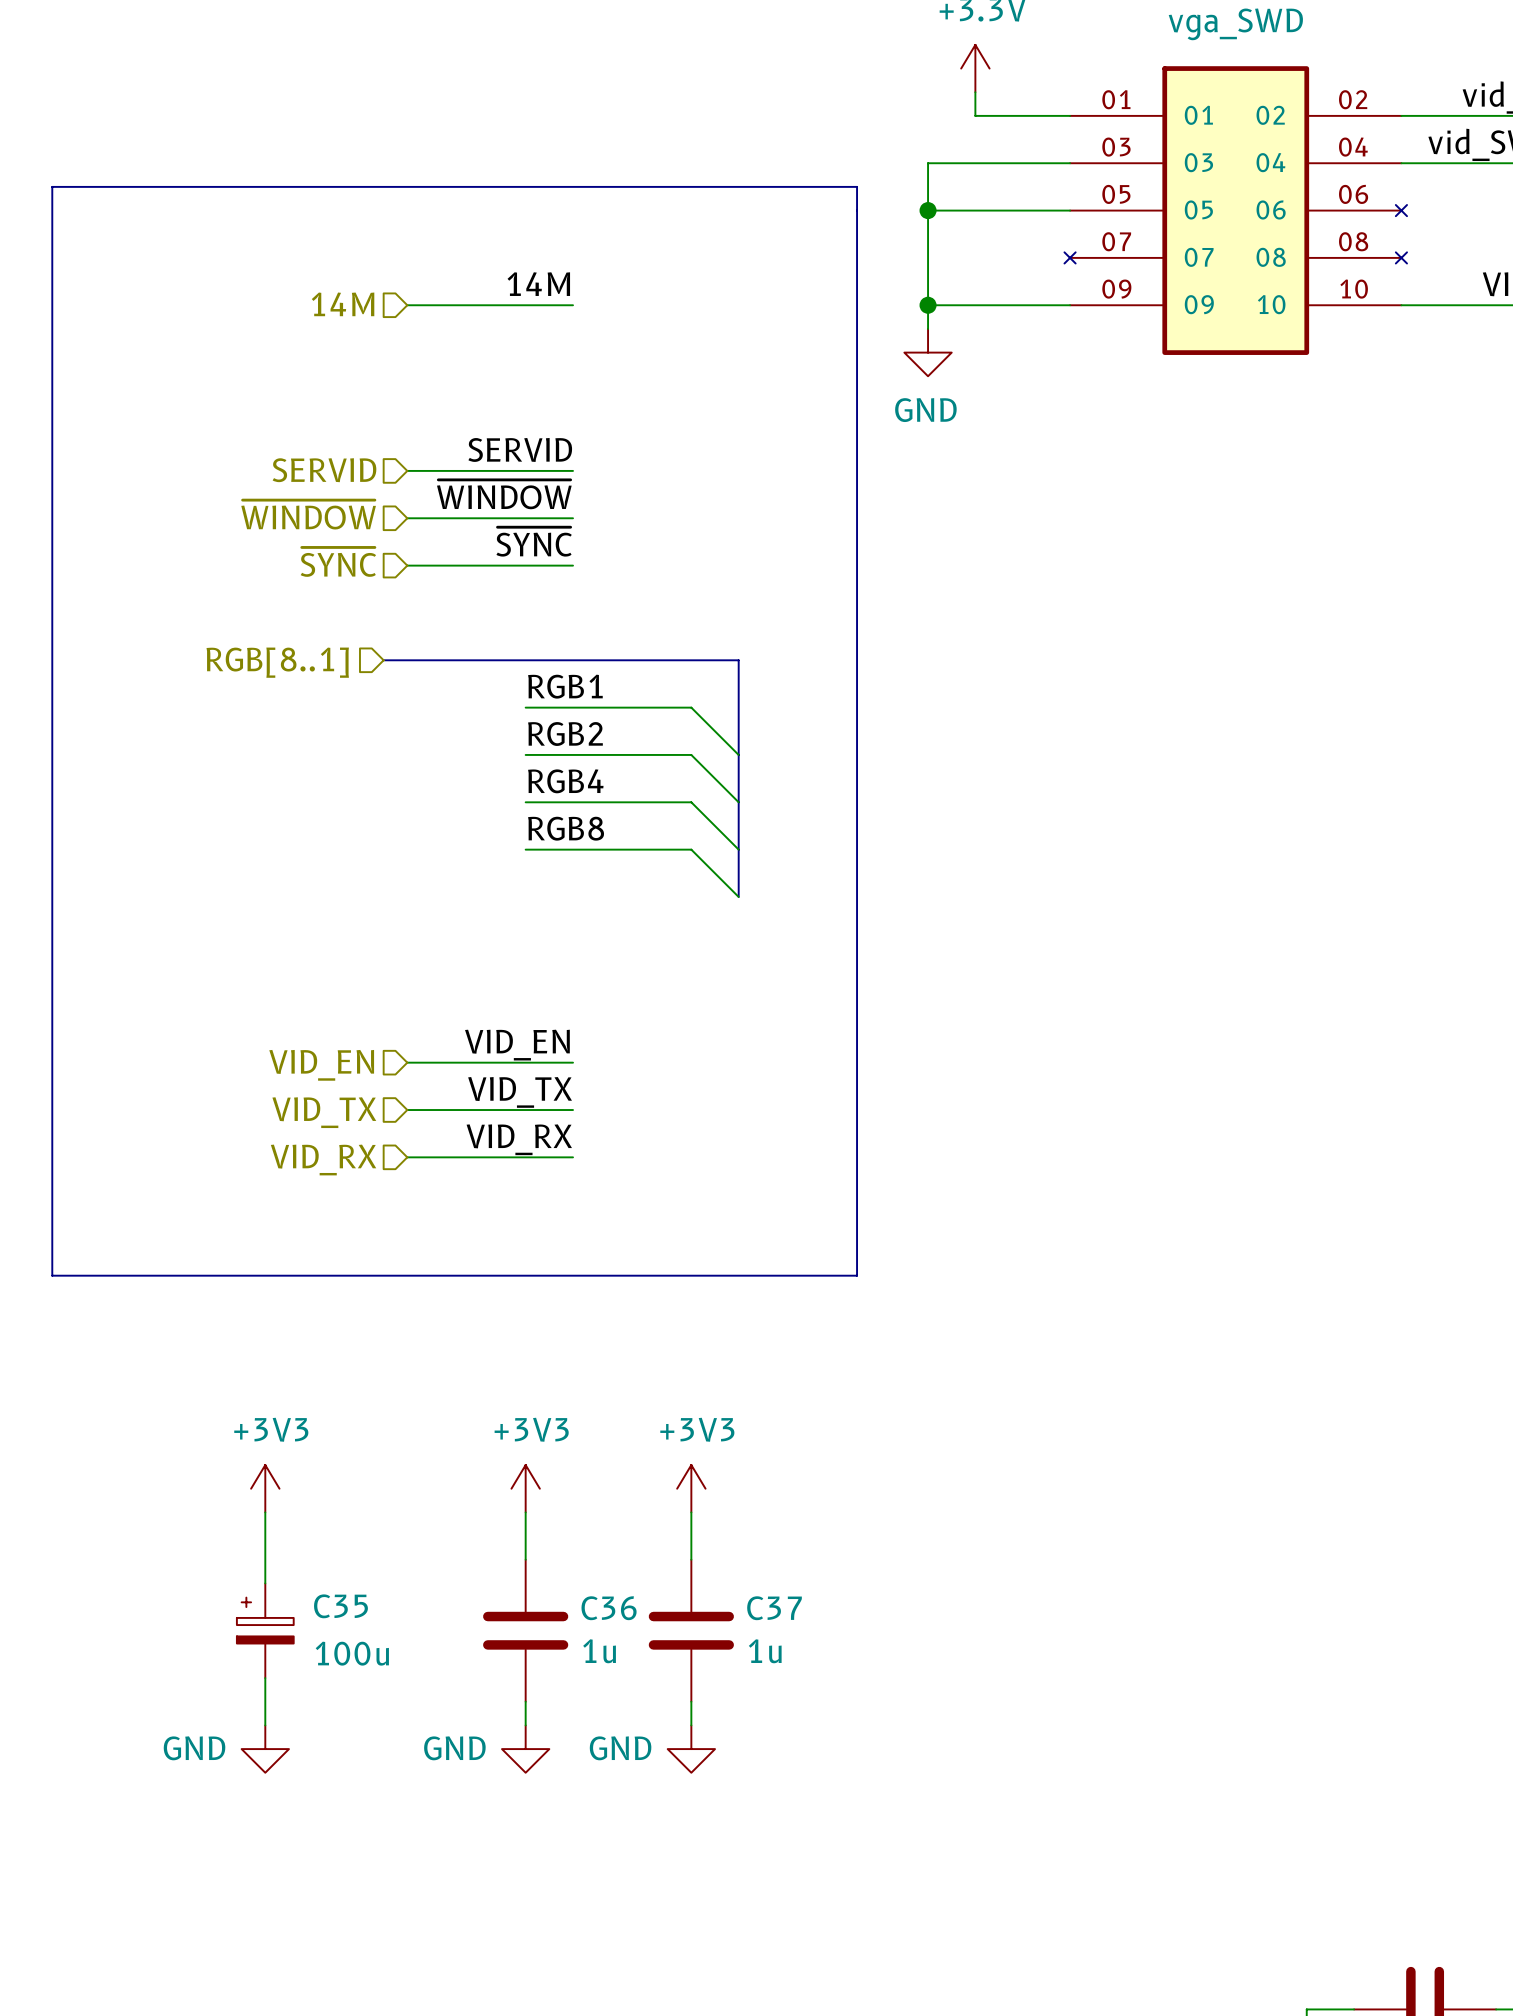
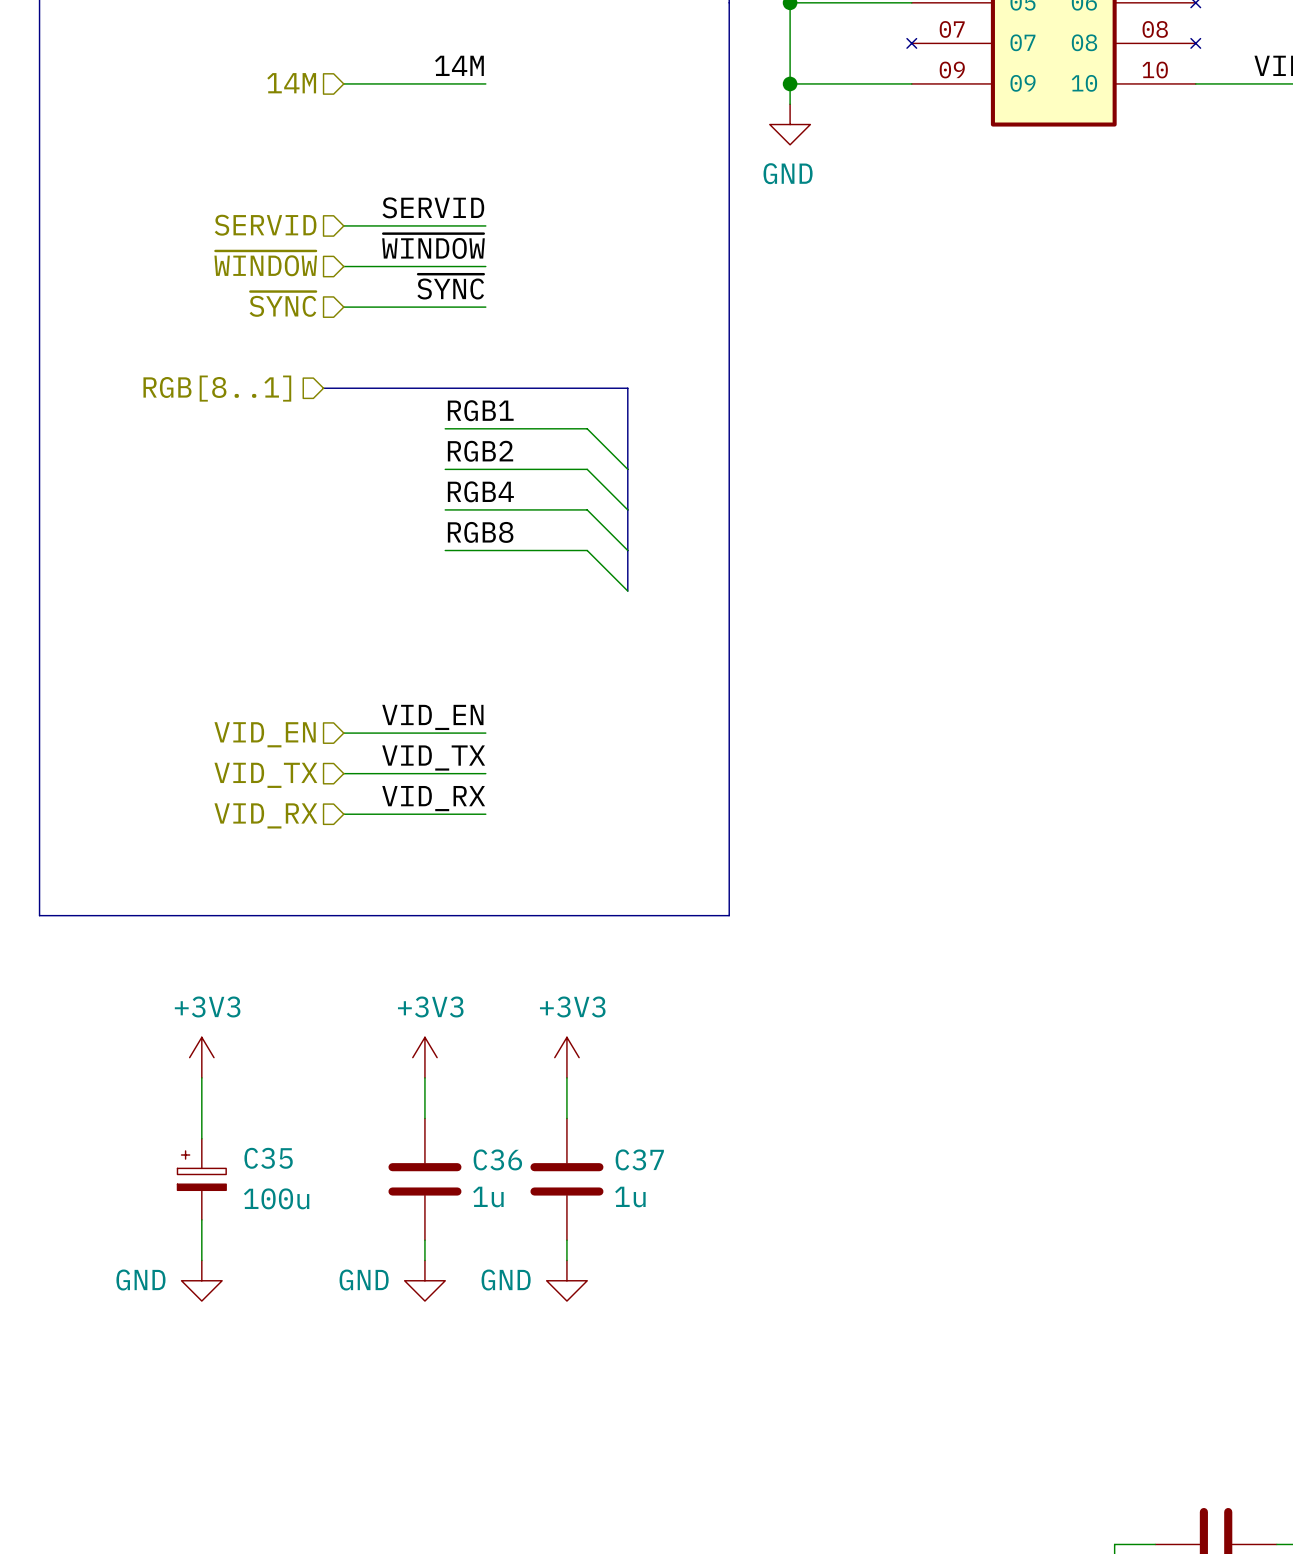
power symbol position: +3V3 (265, 1488) -> +3V3 (201, 1057)
power symbol position: +3V3 (525, 1488) -> +3V3 (424, 1057)
power symbol position: +3V3 (691, 1488) -> +3V3 (566, 1057)
wire: (265, 1512) (265, 1583) -> (201, 1077) (201, 1138)
wire: (525, 1512) (525, 1559) -> (424, 1077) (424, 1118)
wire: (691, 1512) (691, 1559) -> (566, 1077) (566, 1118)
C35 position: (265, 1630) -> (201, 1179)
C36 position: (525, 1630) -> (424, 1179)
C37 position: (691, 1630) -> (566, 1179)
wire: (265, 1678) (265, 1725) -> (201, 1219) (201, 1260)
wire: (525, 1701) (525, 1725) -> (424, 1240) (424, 1260)
wire: (691, 1701) (691, 1725) -> (566, 1240) (566, 1260)
power symbol position: GND (265, 1749) -> GND (201, 1280)
power symbol position: GND (525, 1749) -> GND (424, 1280)
power symbol position: GND (691, 1749) -> GND (566, 1280)

